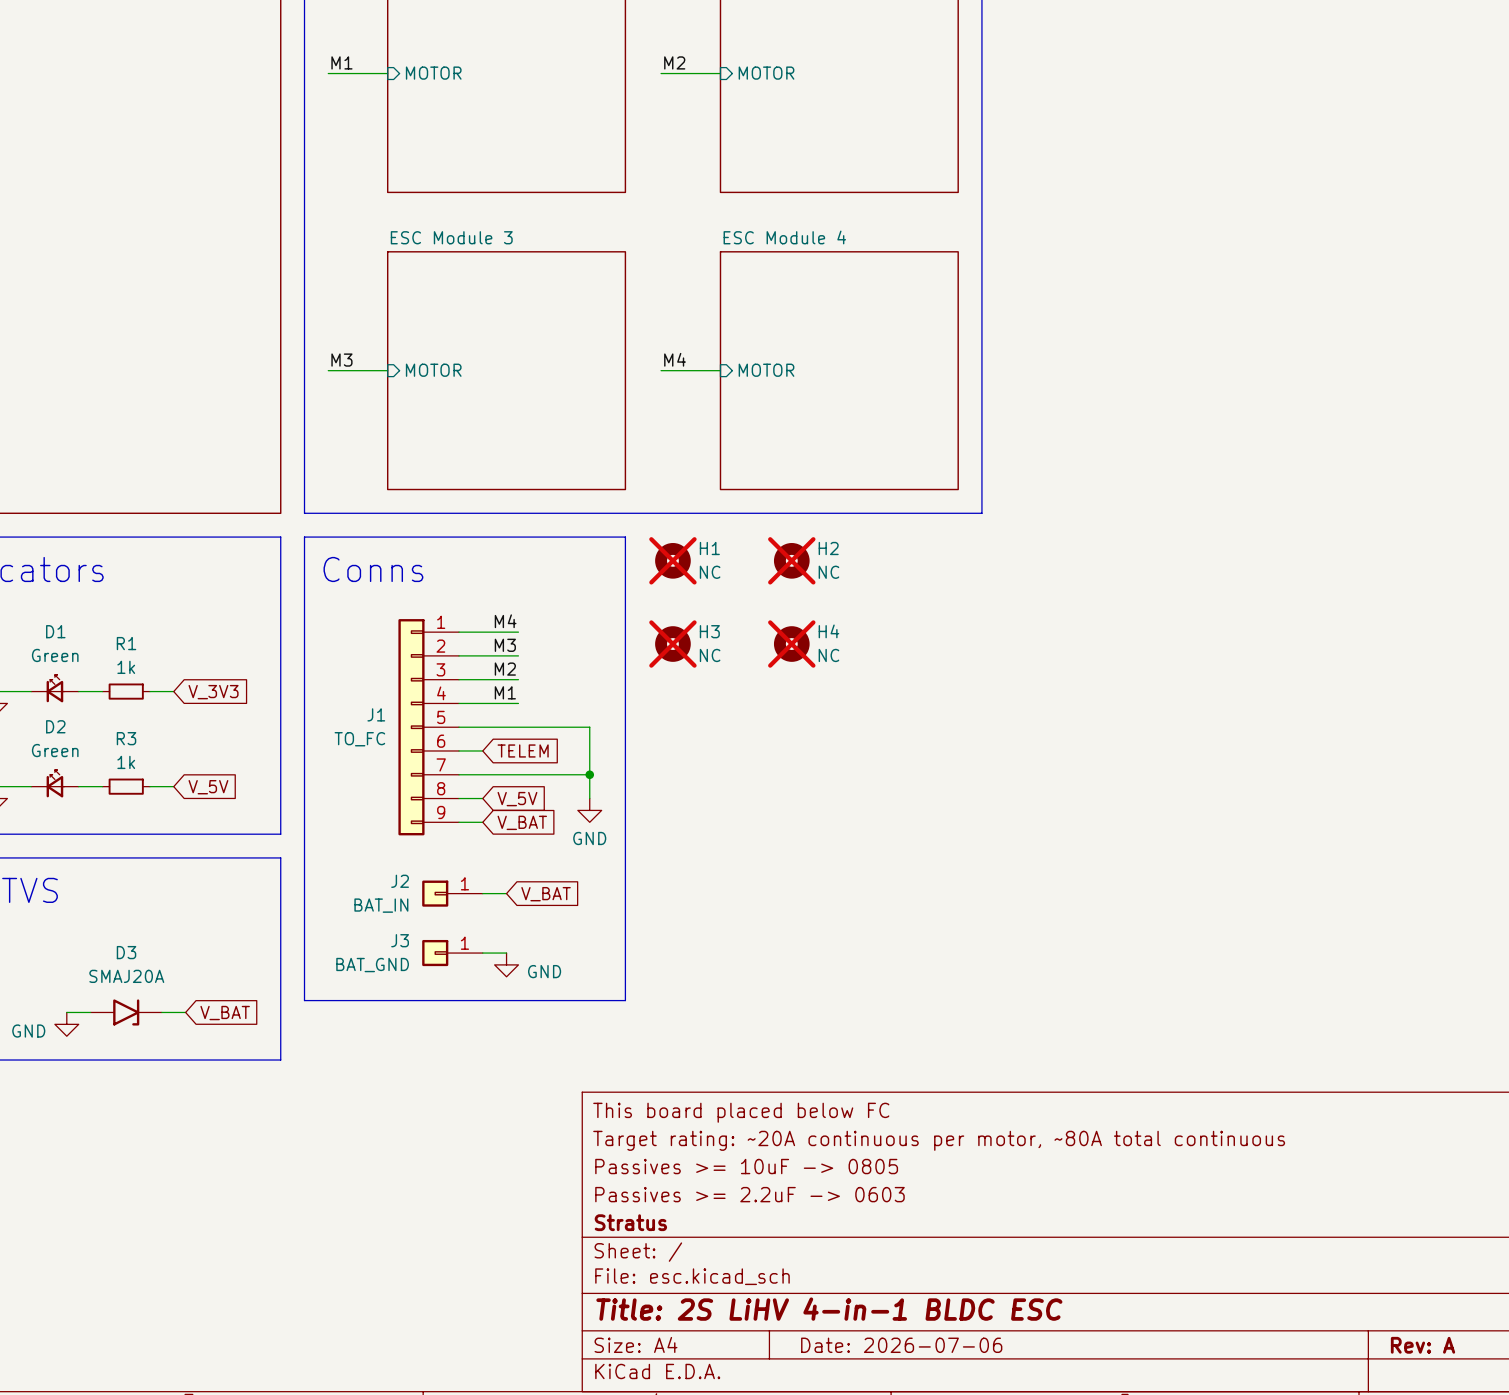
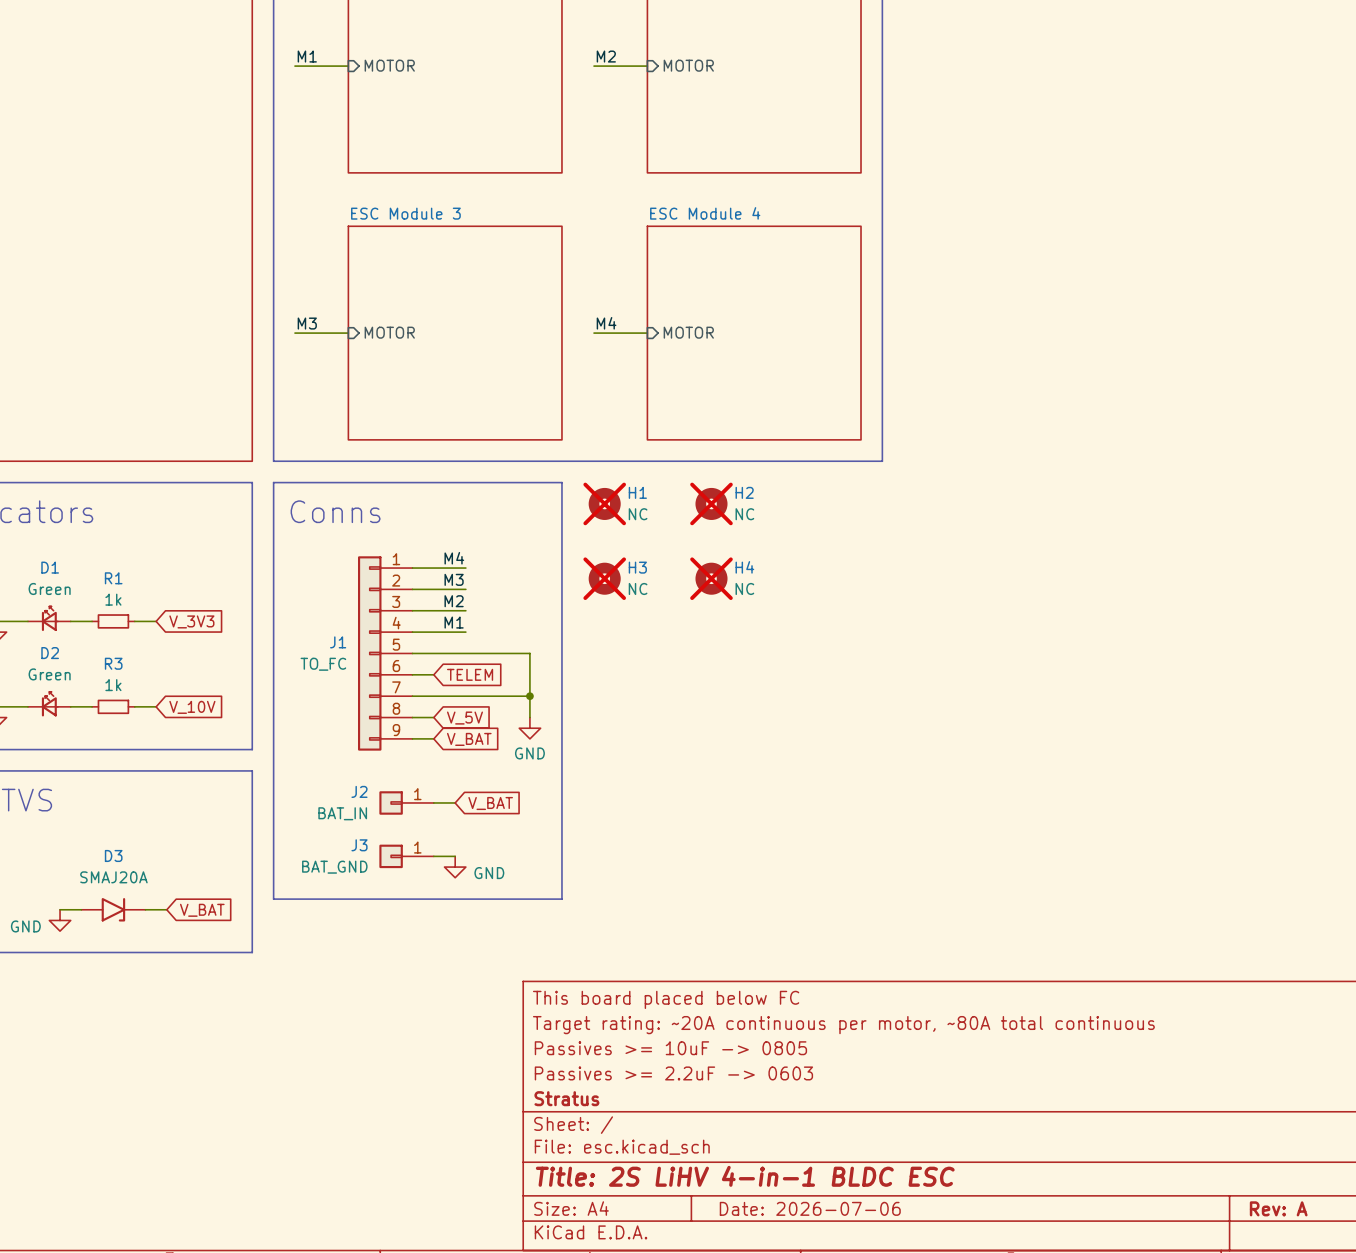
global label: V_5V (208, 787) -> V_10V (192, 707)

